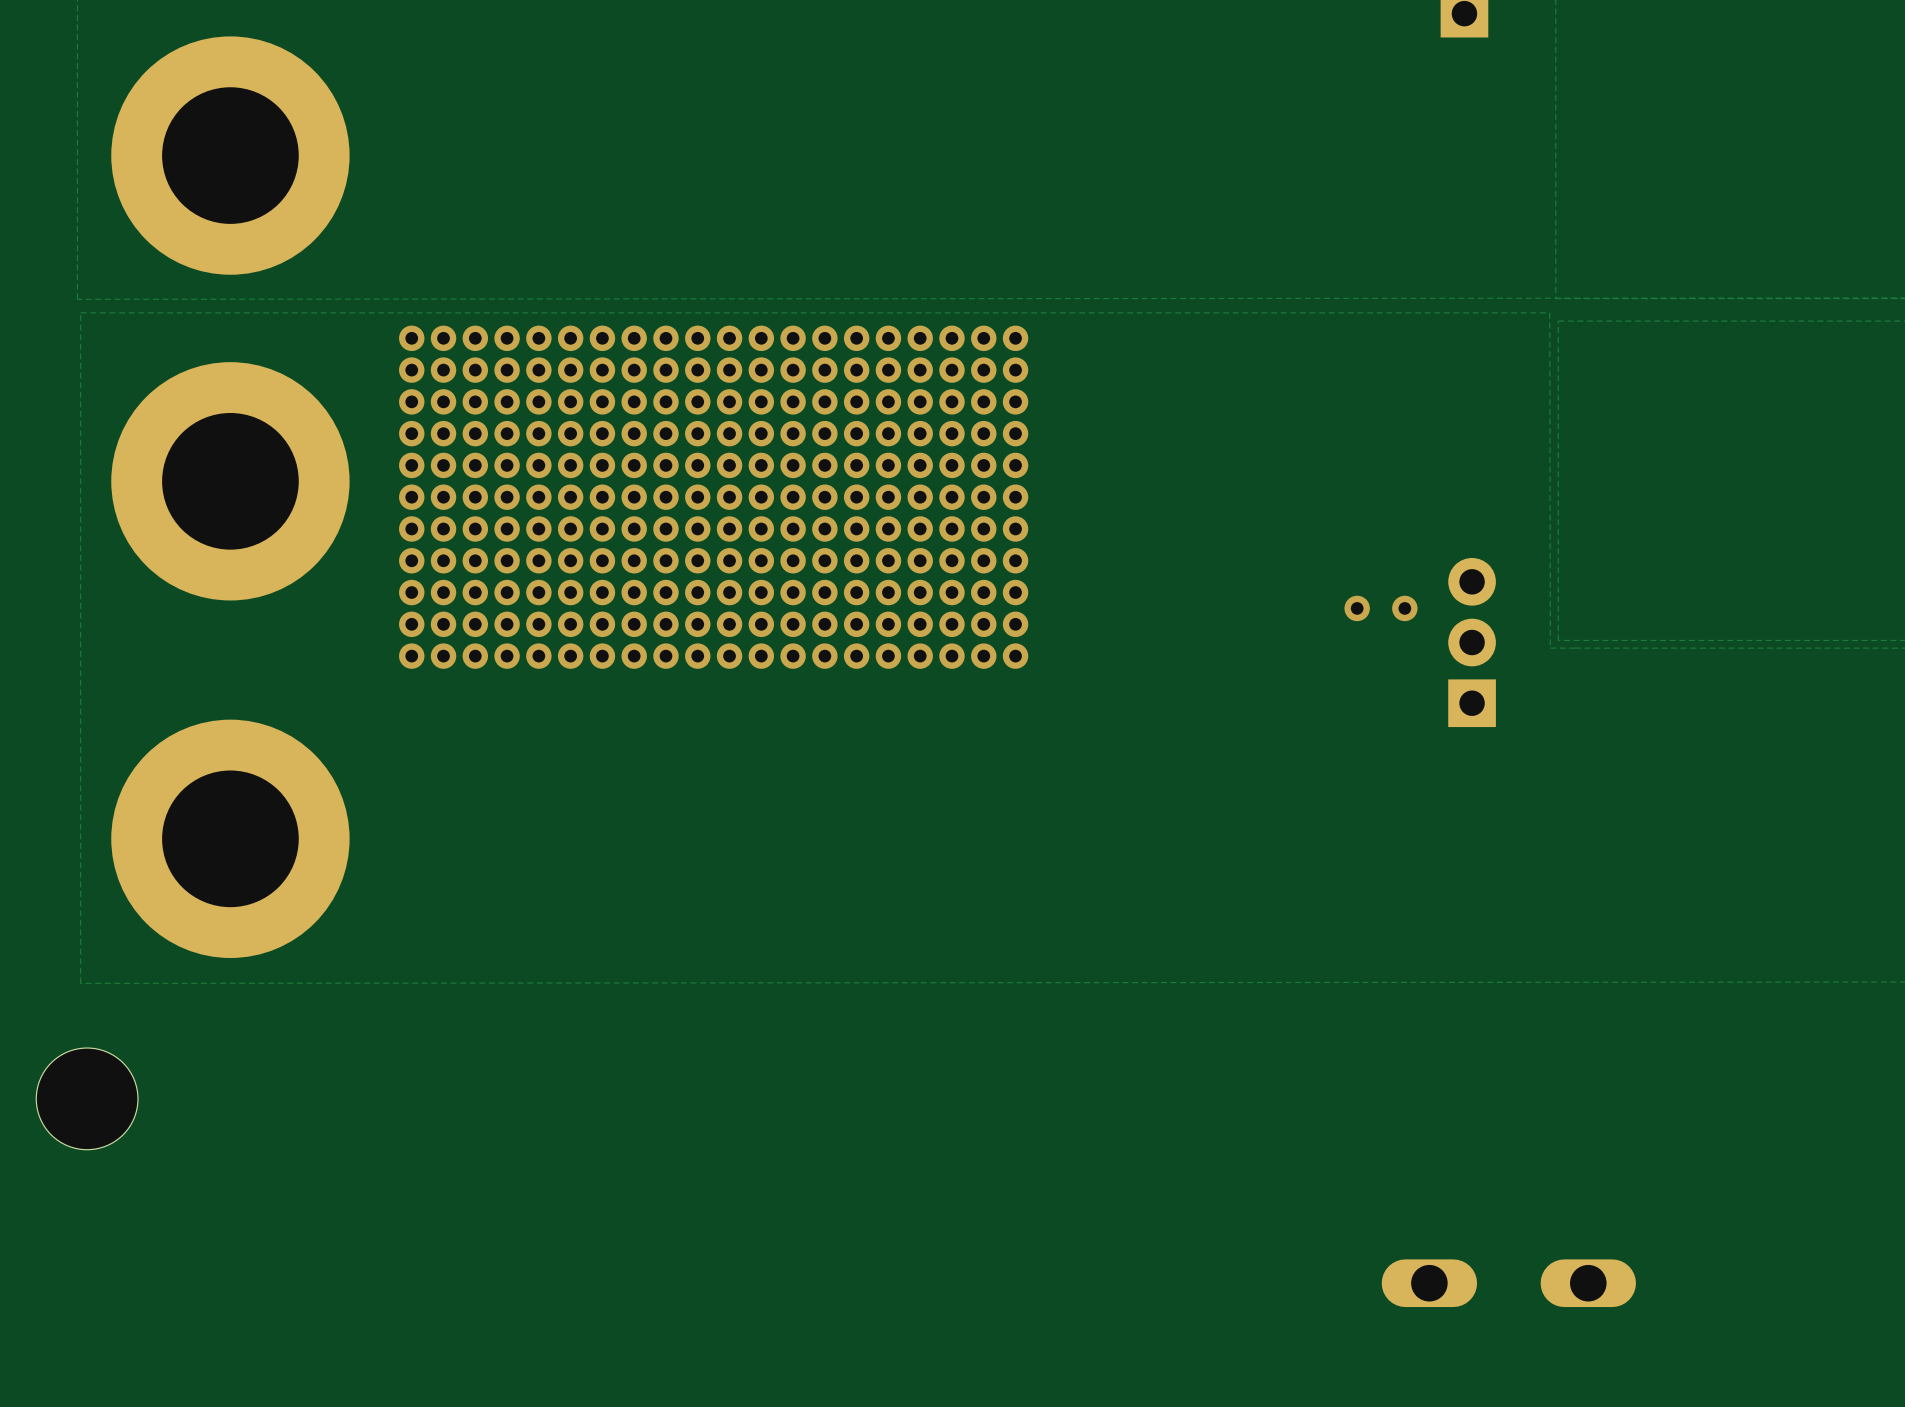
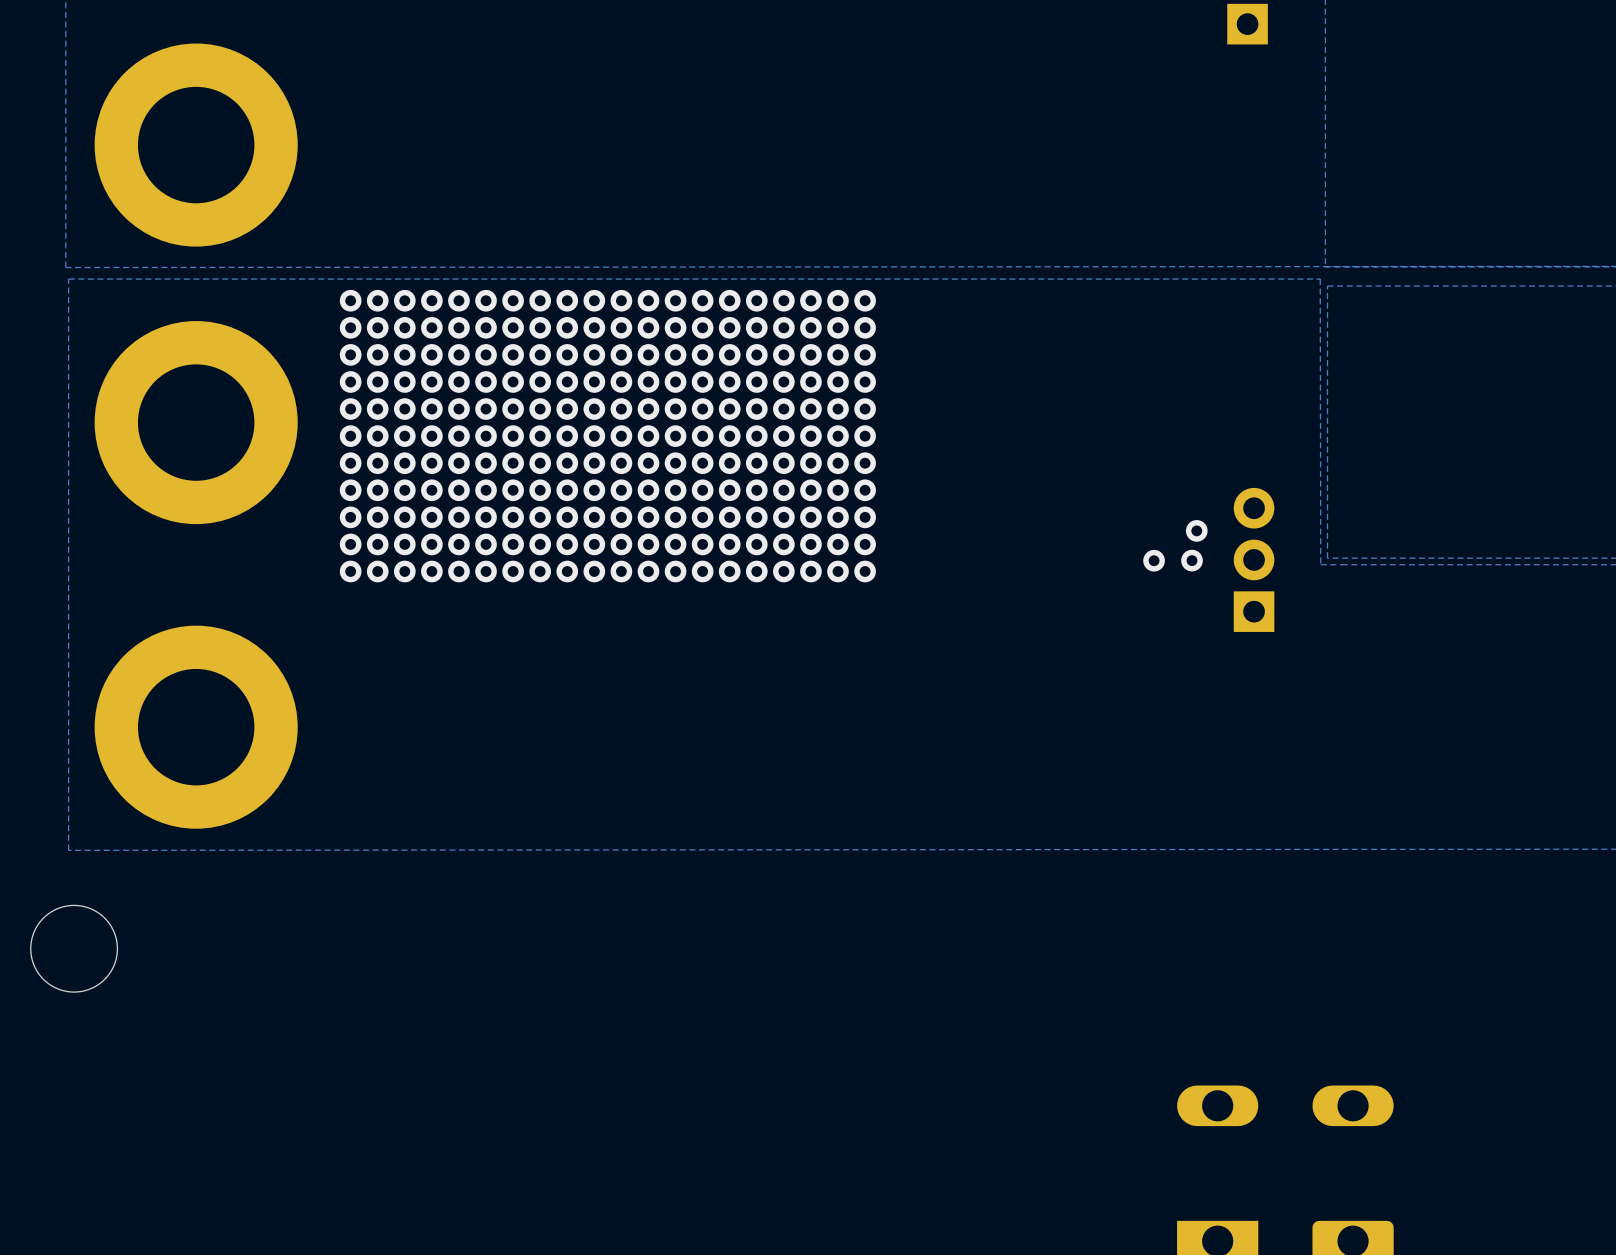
via: (1357, 608) -> none
via: none -> (1154, 560)
via: none -> (1192, 560)

